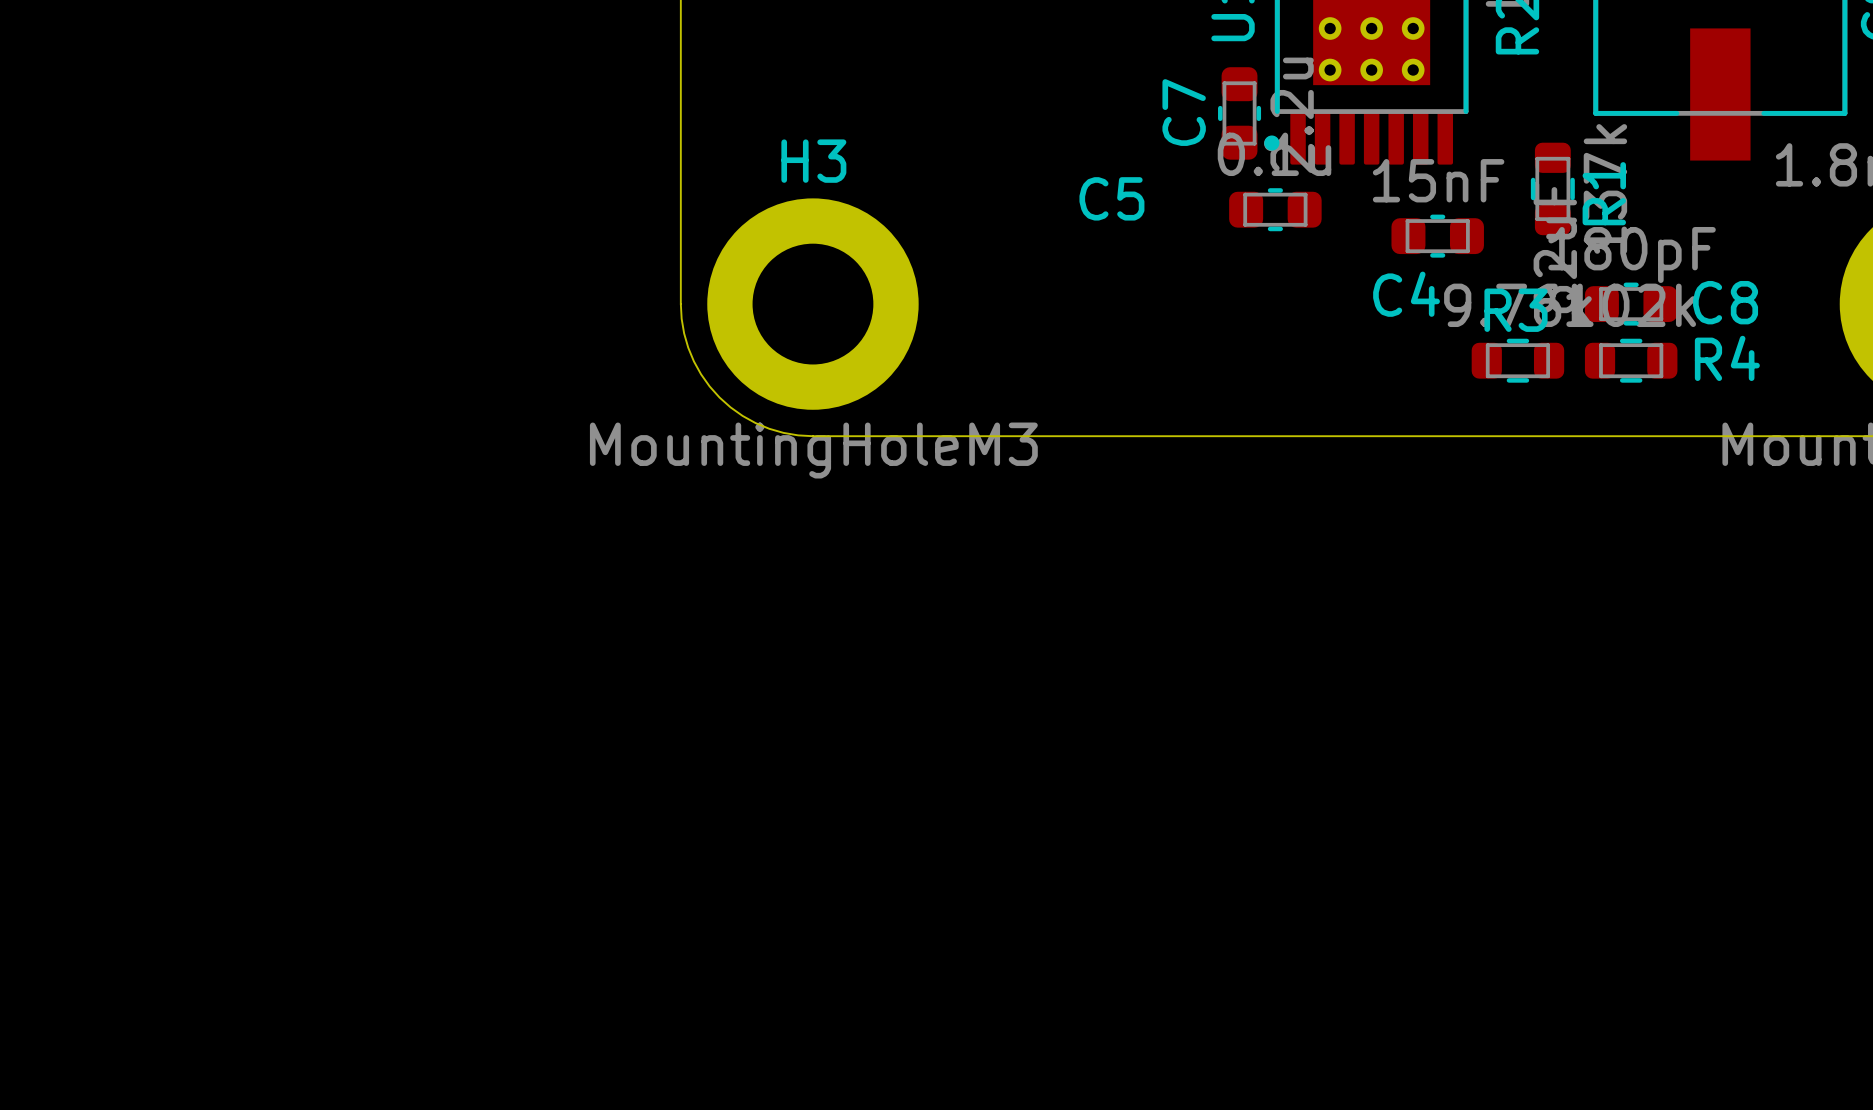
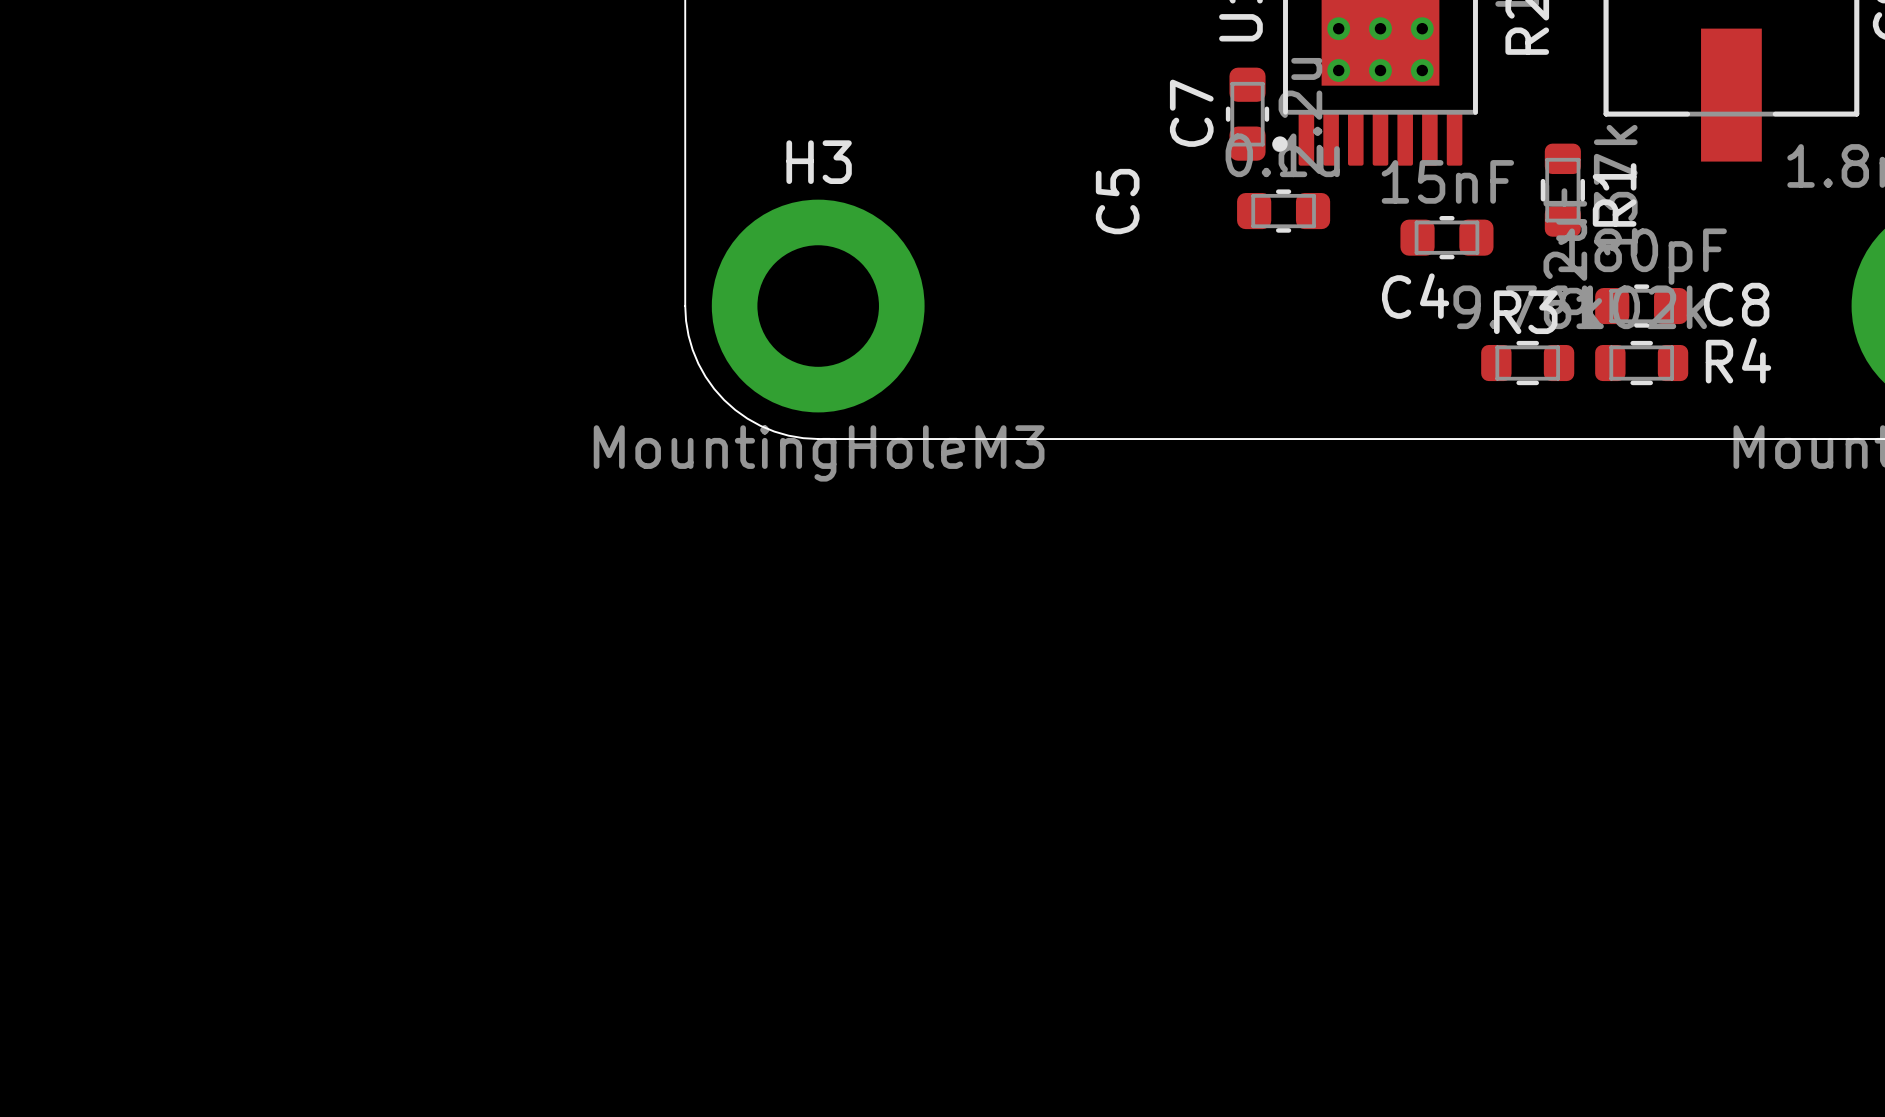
C5 name rotation: 0° (1111, 198) -> 90° counterclockwise (1117, 201)

